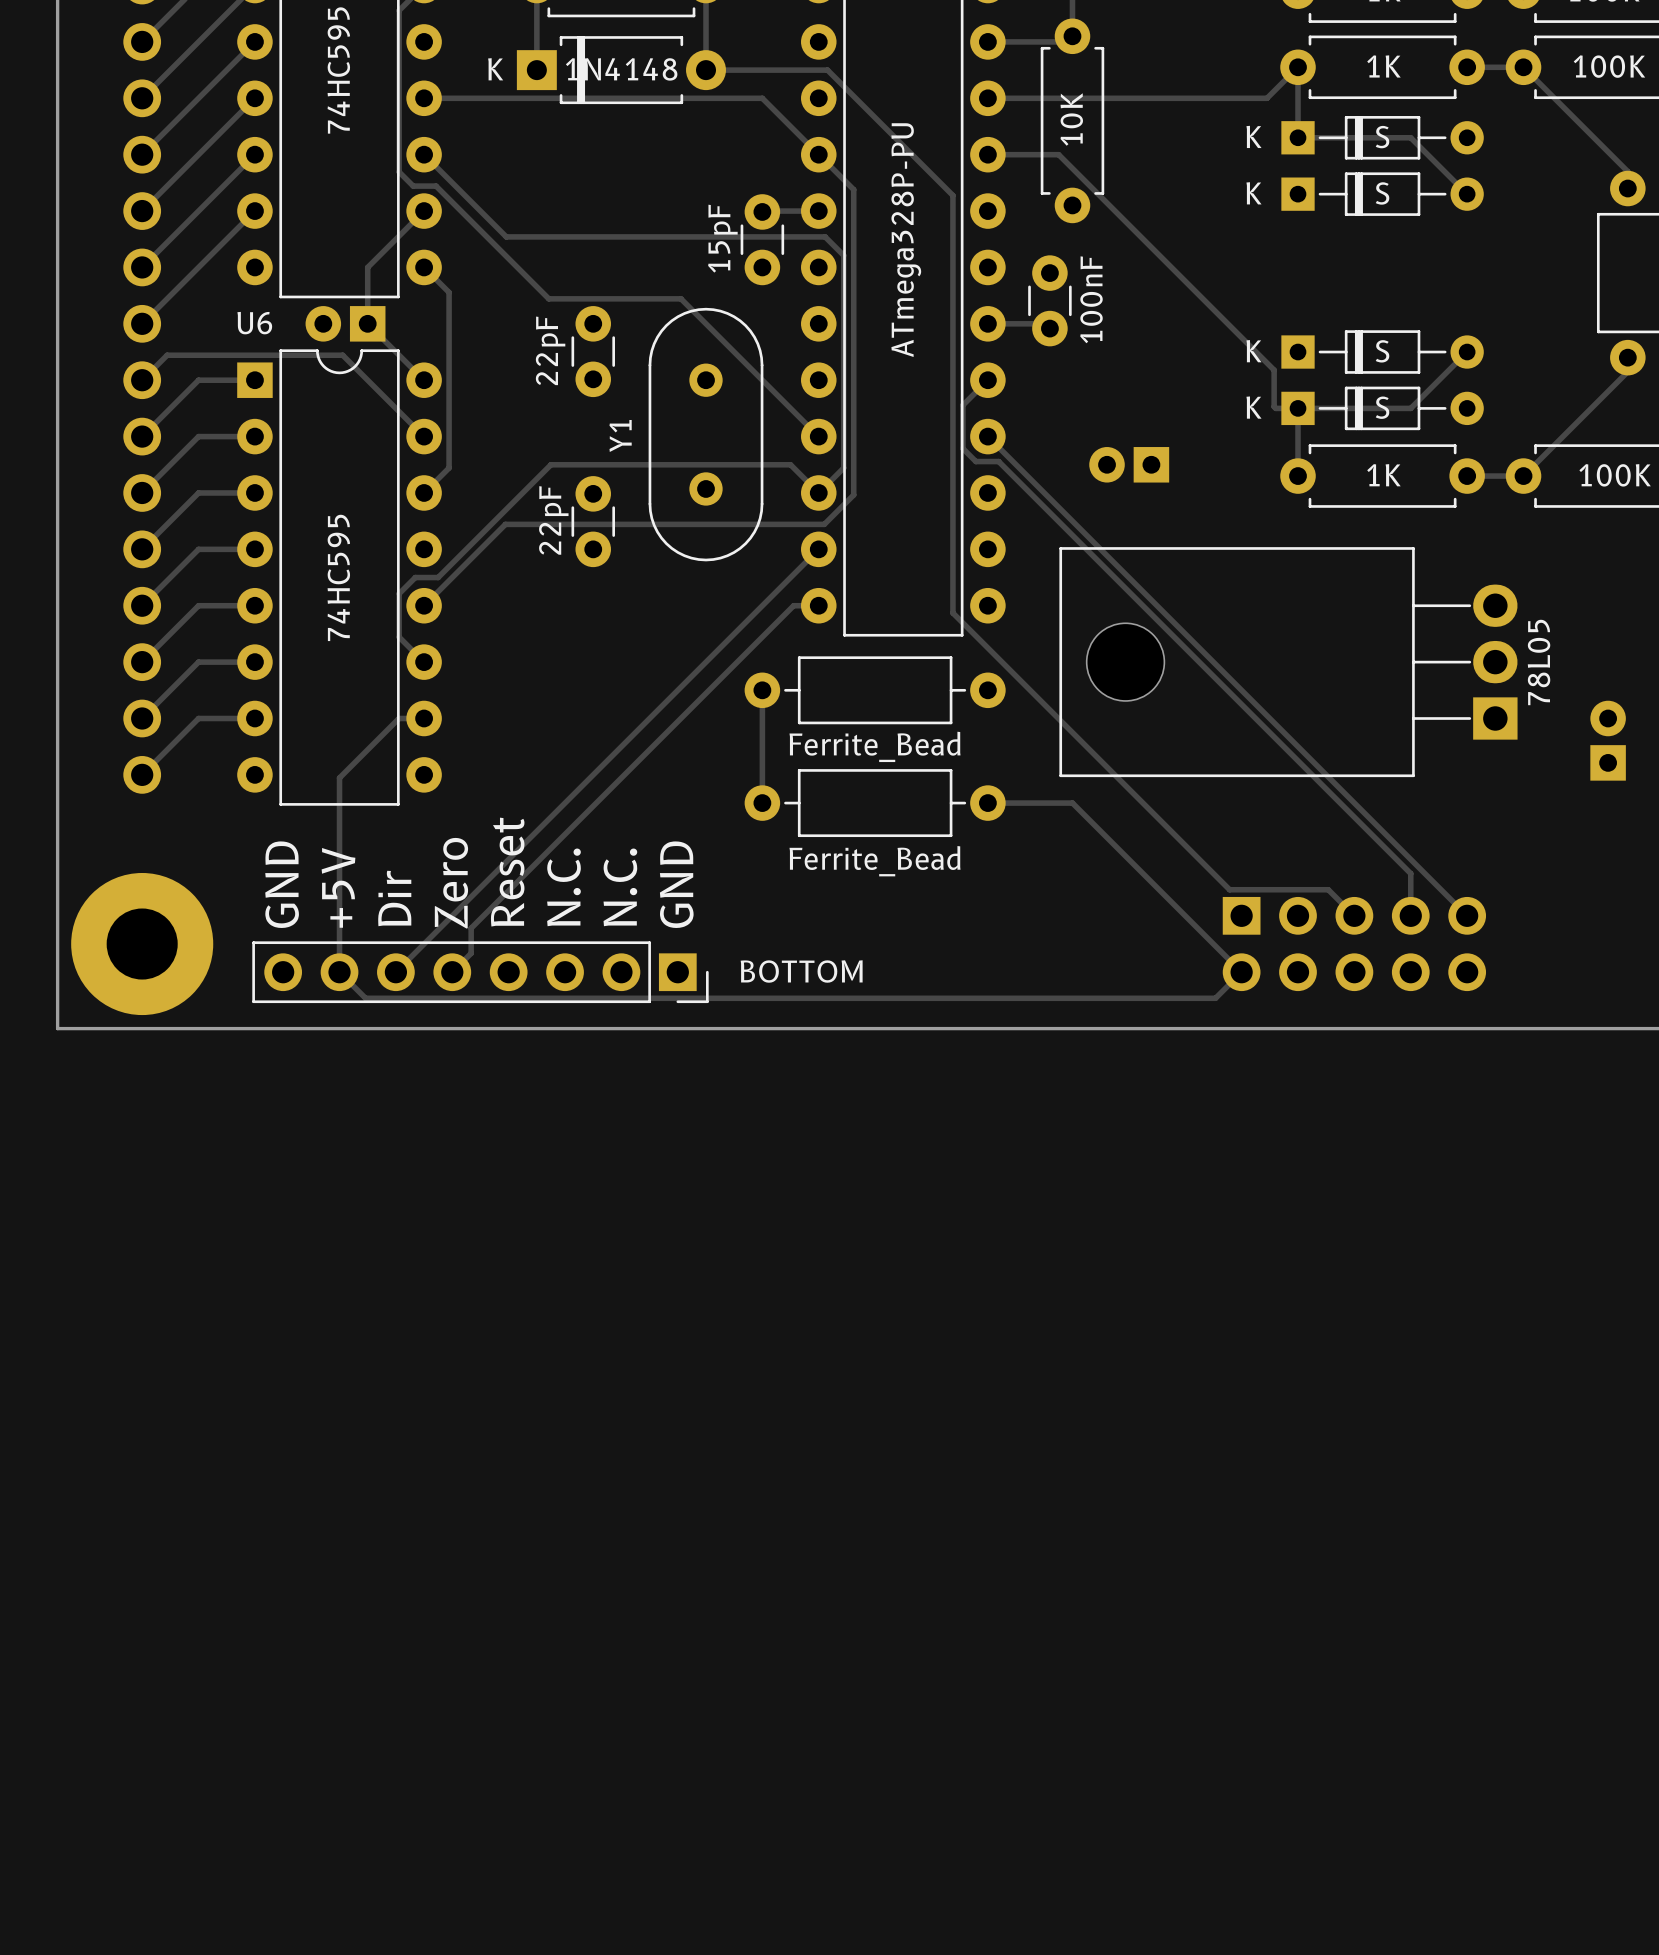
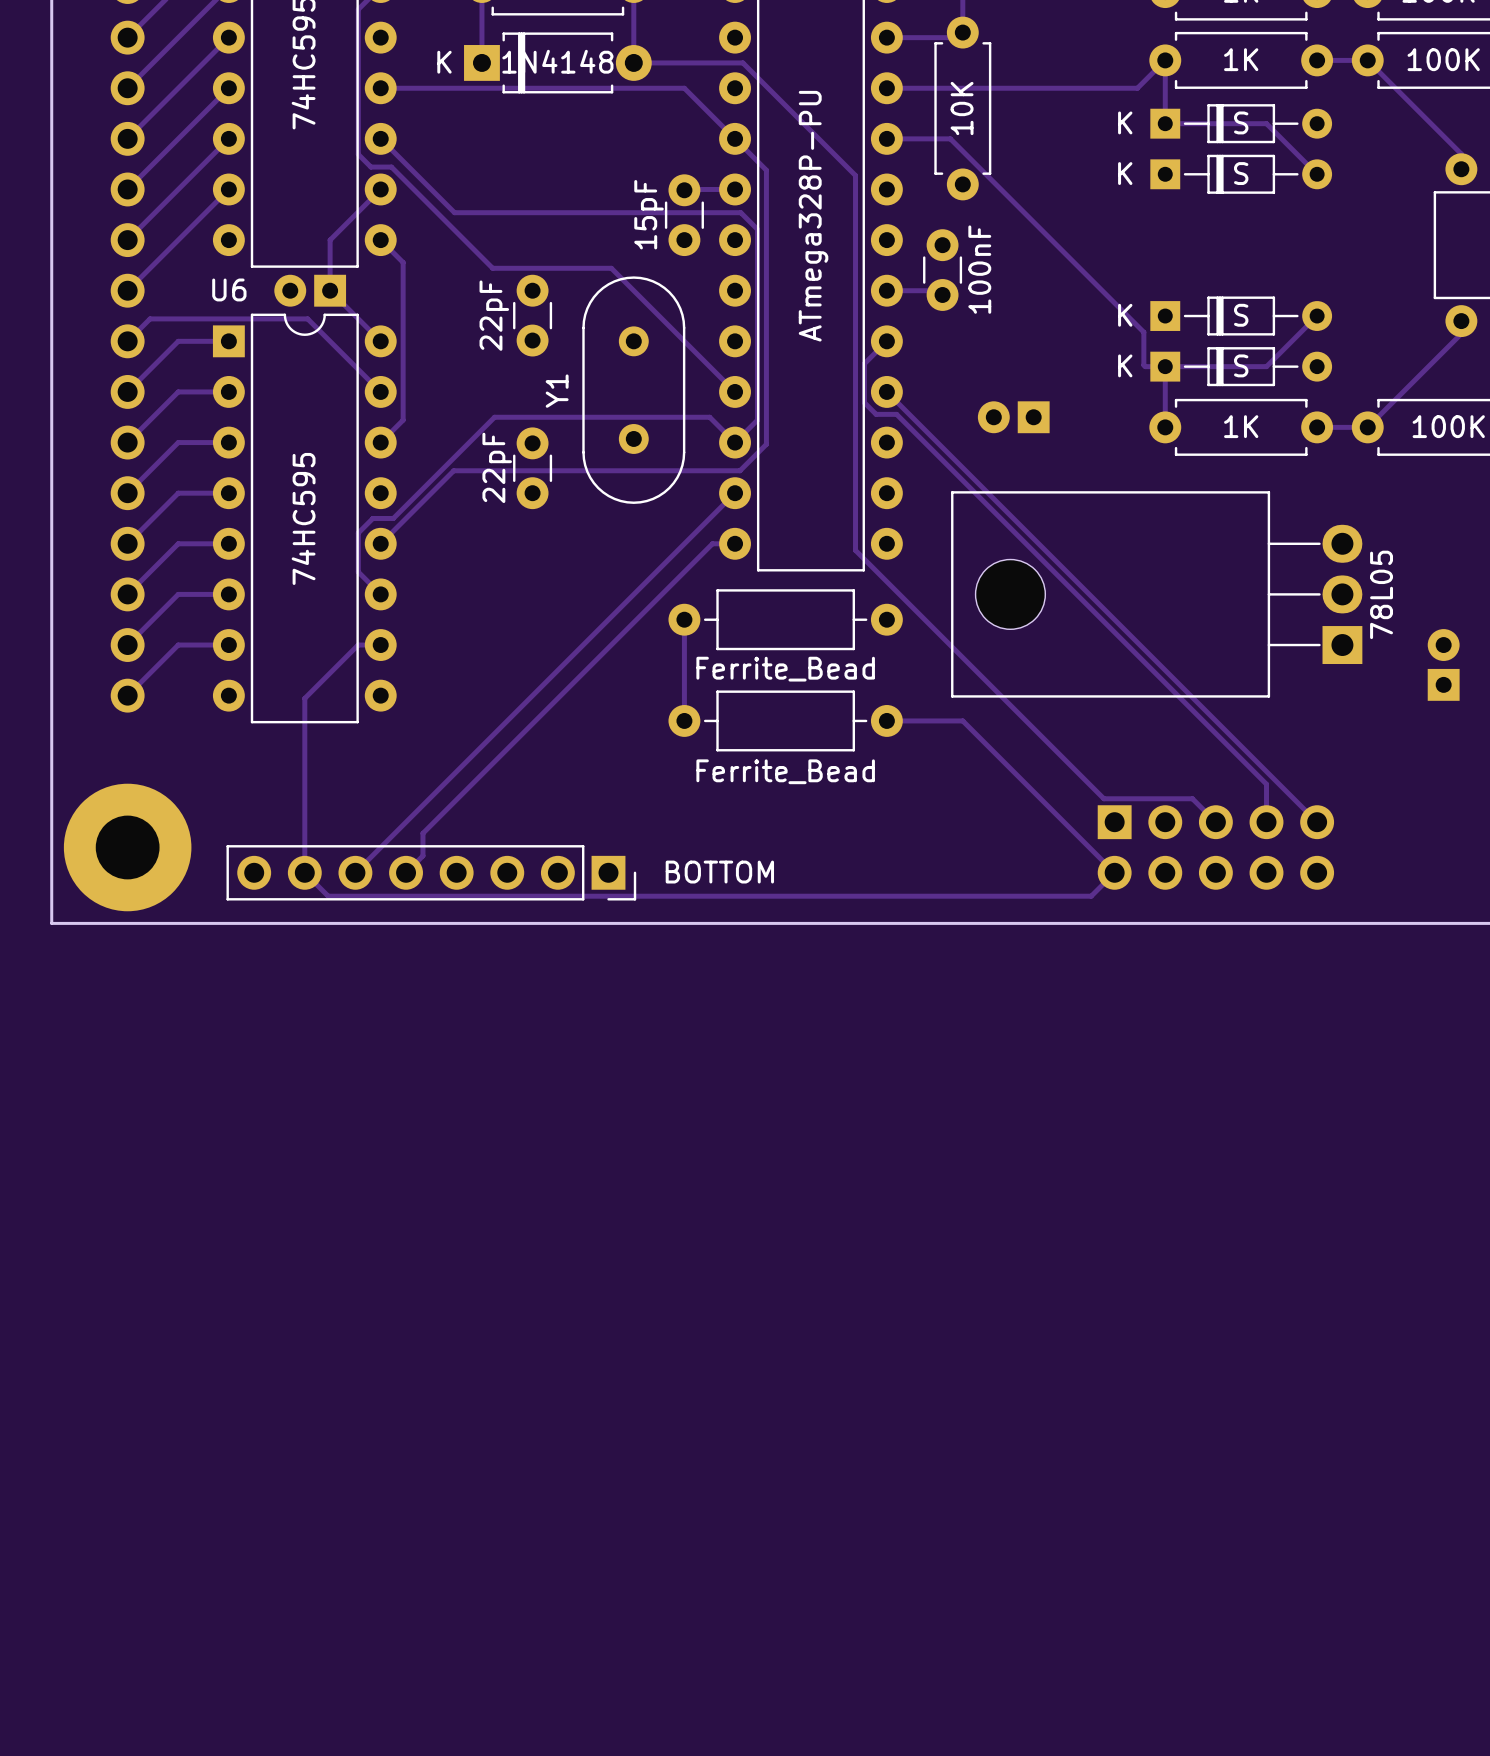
text: Reset (507, 872) -> none
text: Zero (451, 883) -> none
text: GND (282, 884) -> none
text: GND (676, 884) -> none
text: +5V (338, 887) -> none
text: N.C. (563, 887) -> none
text: N.C. (620, 887) -> none
text: Dir (394, 898) -> none

